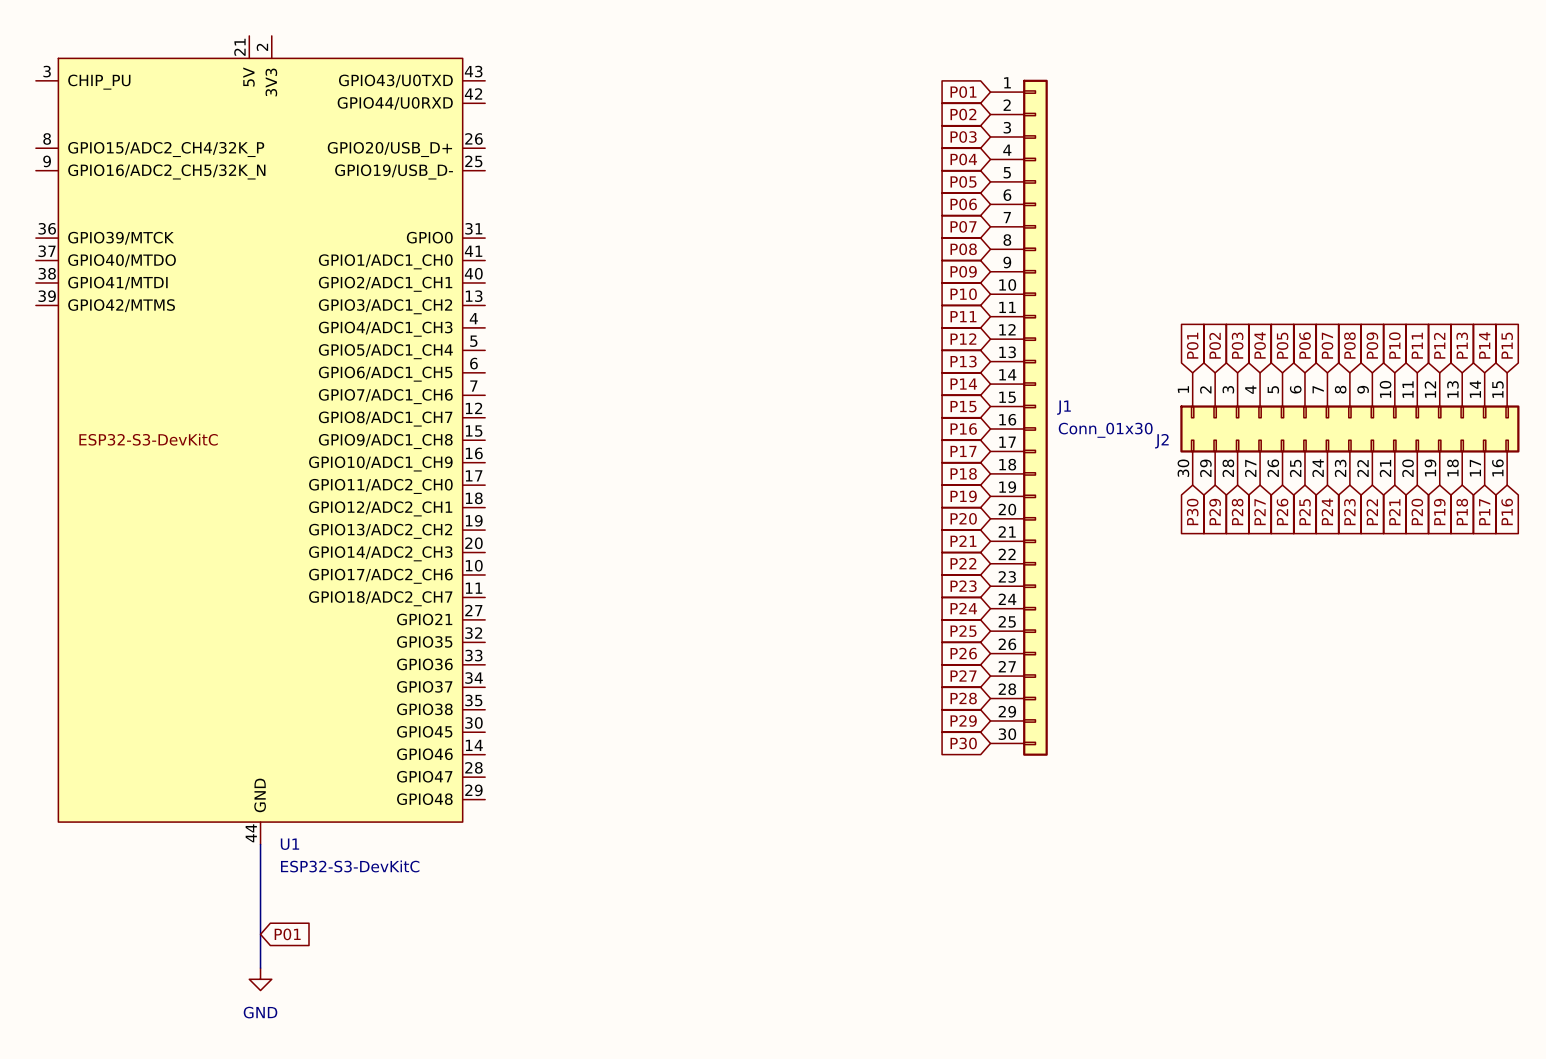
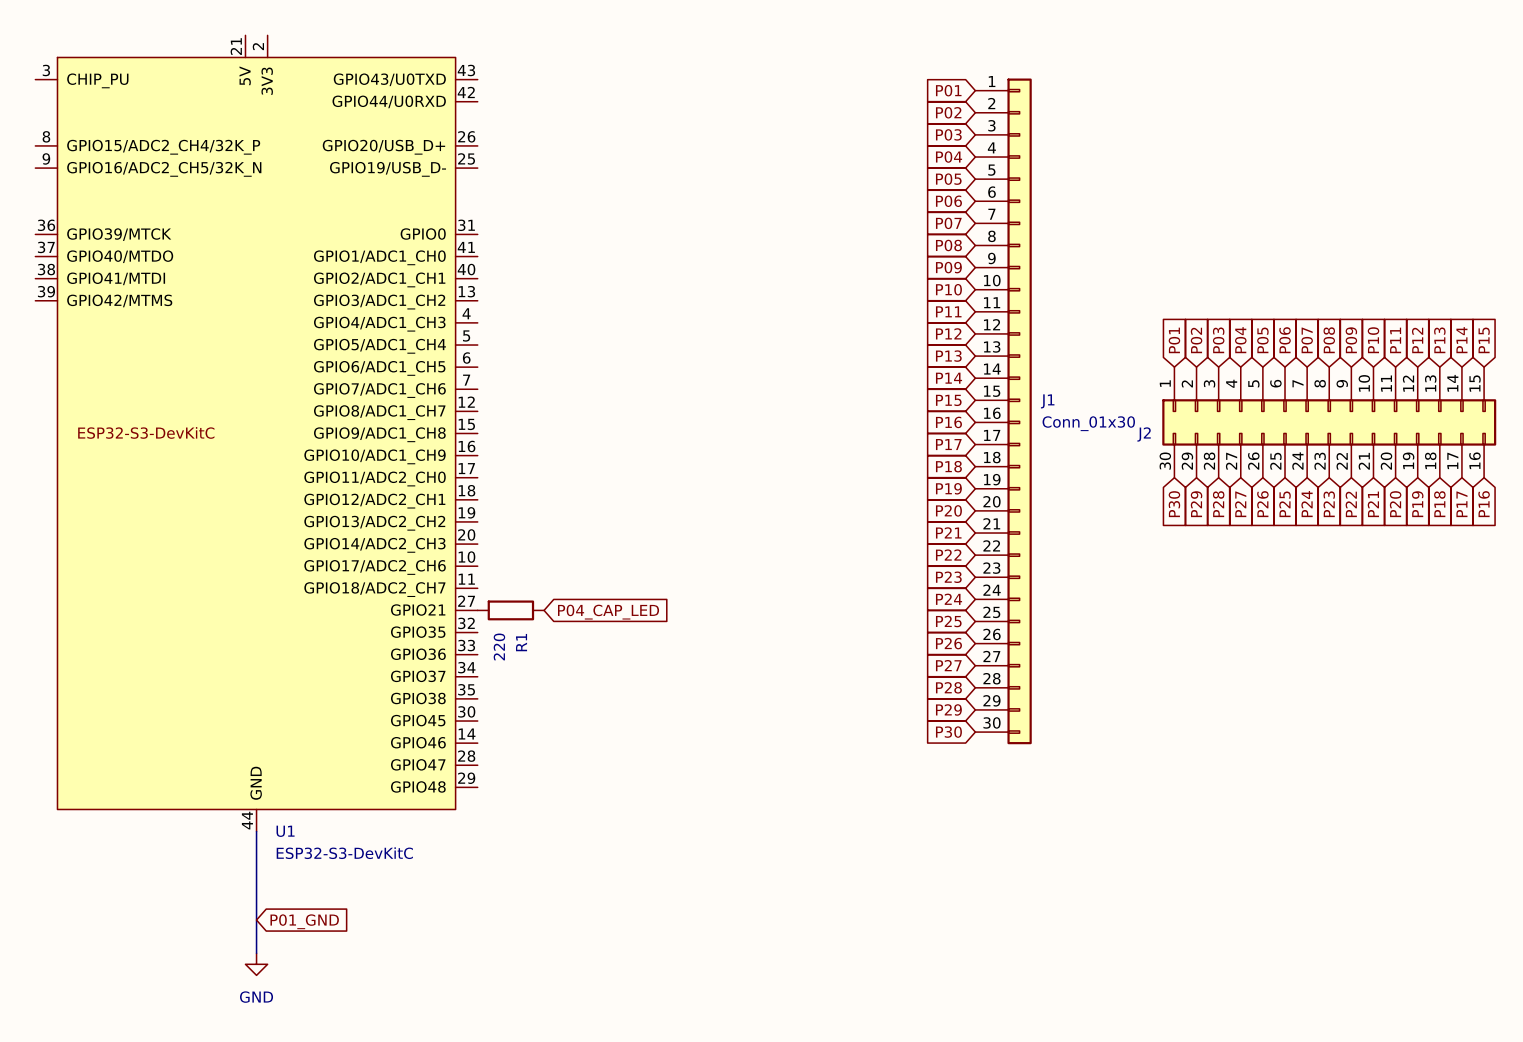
R1: none -> 220 (510, 610)
global label: none -> P04_CAP_LED (608, 612)
global label: P01 (287, 934) -> P01_GND (304, 921)

